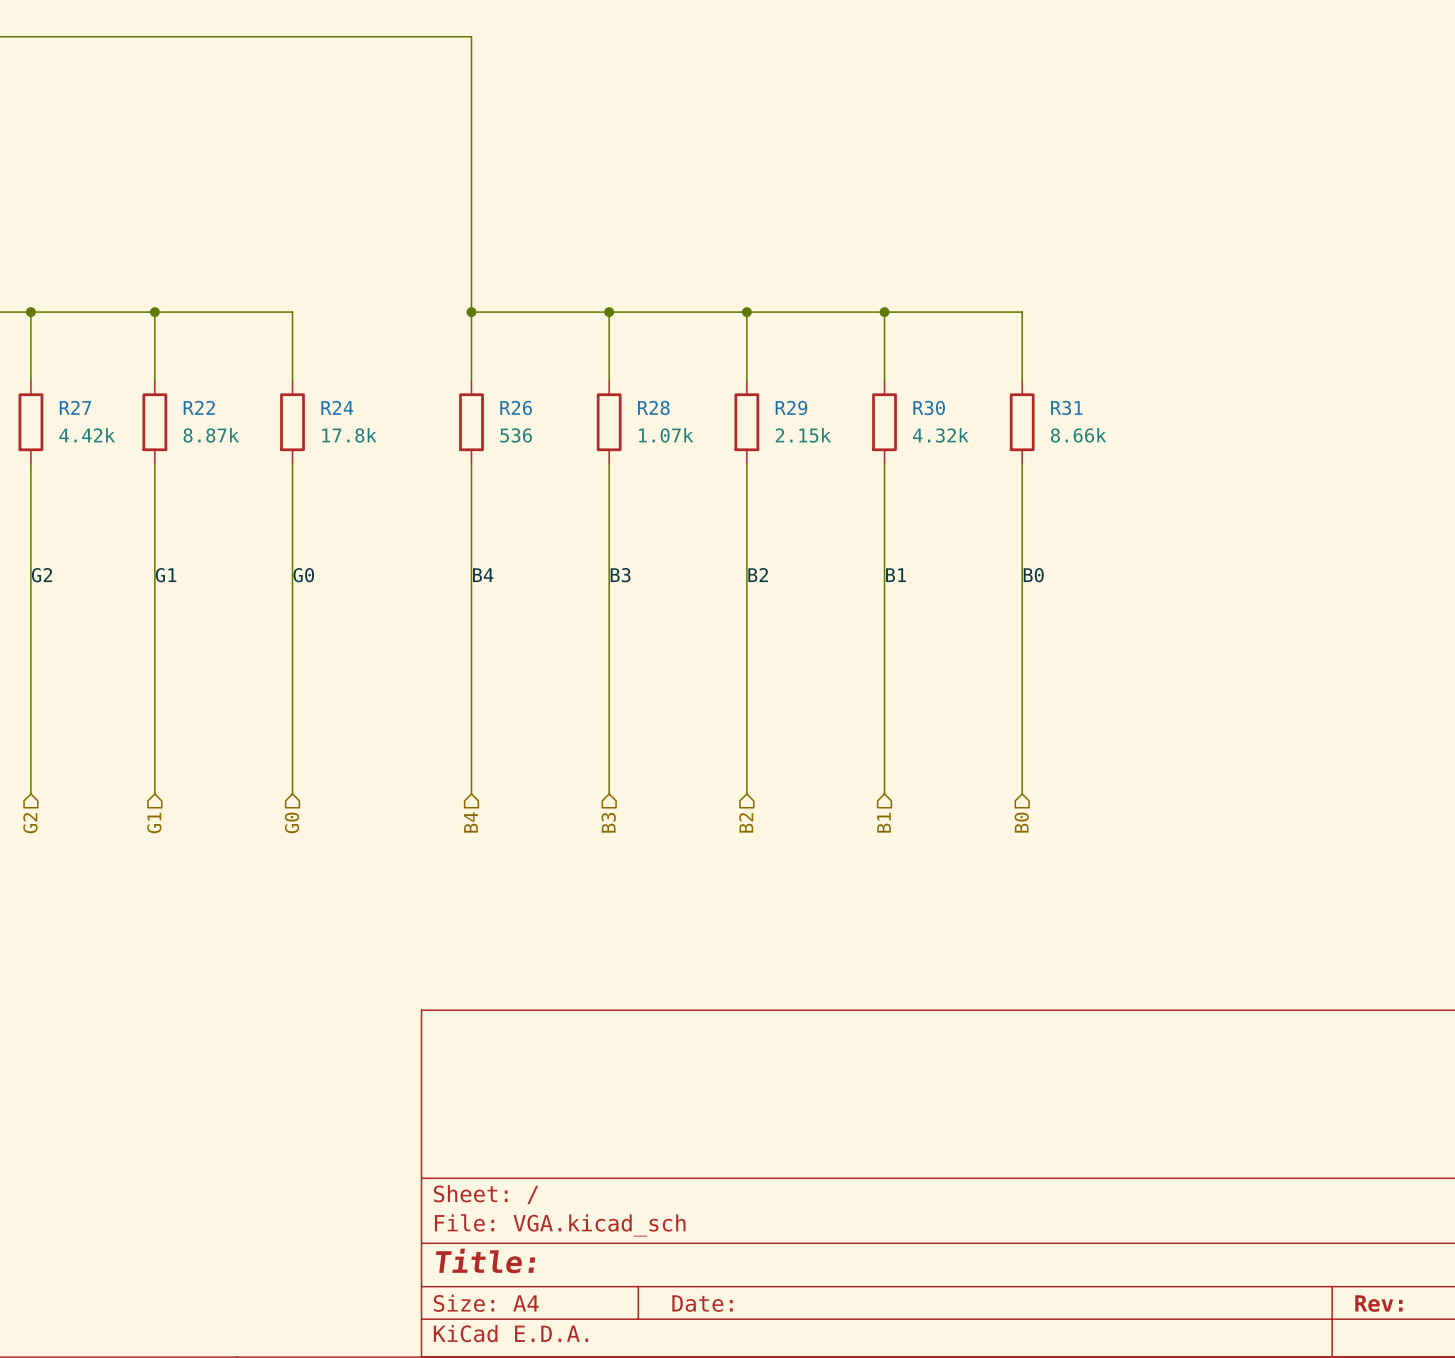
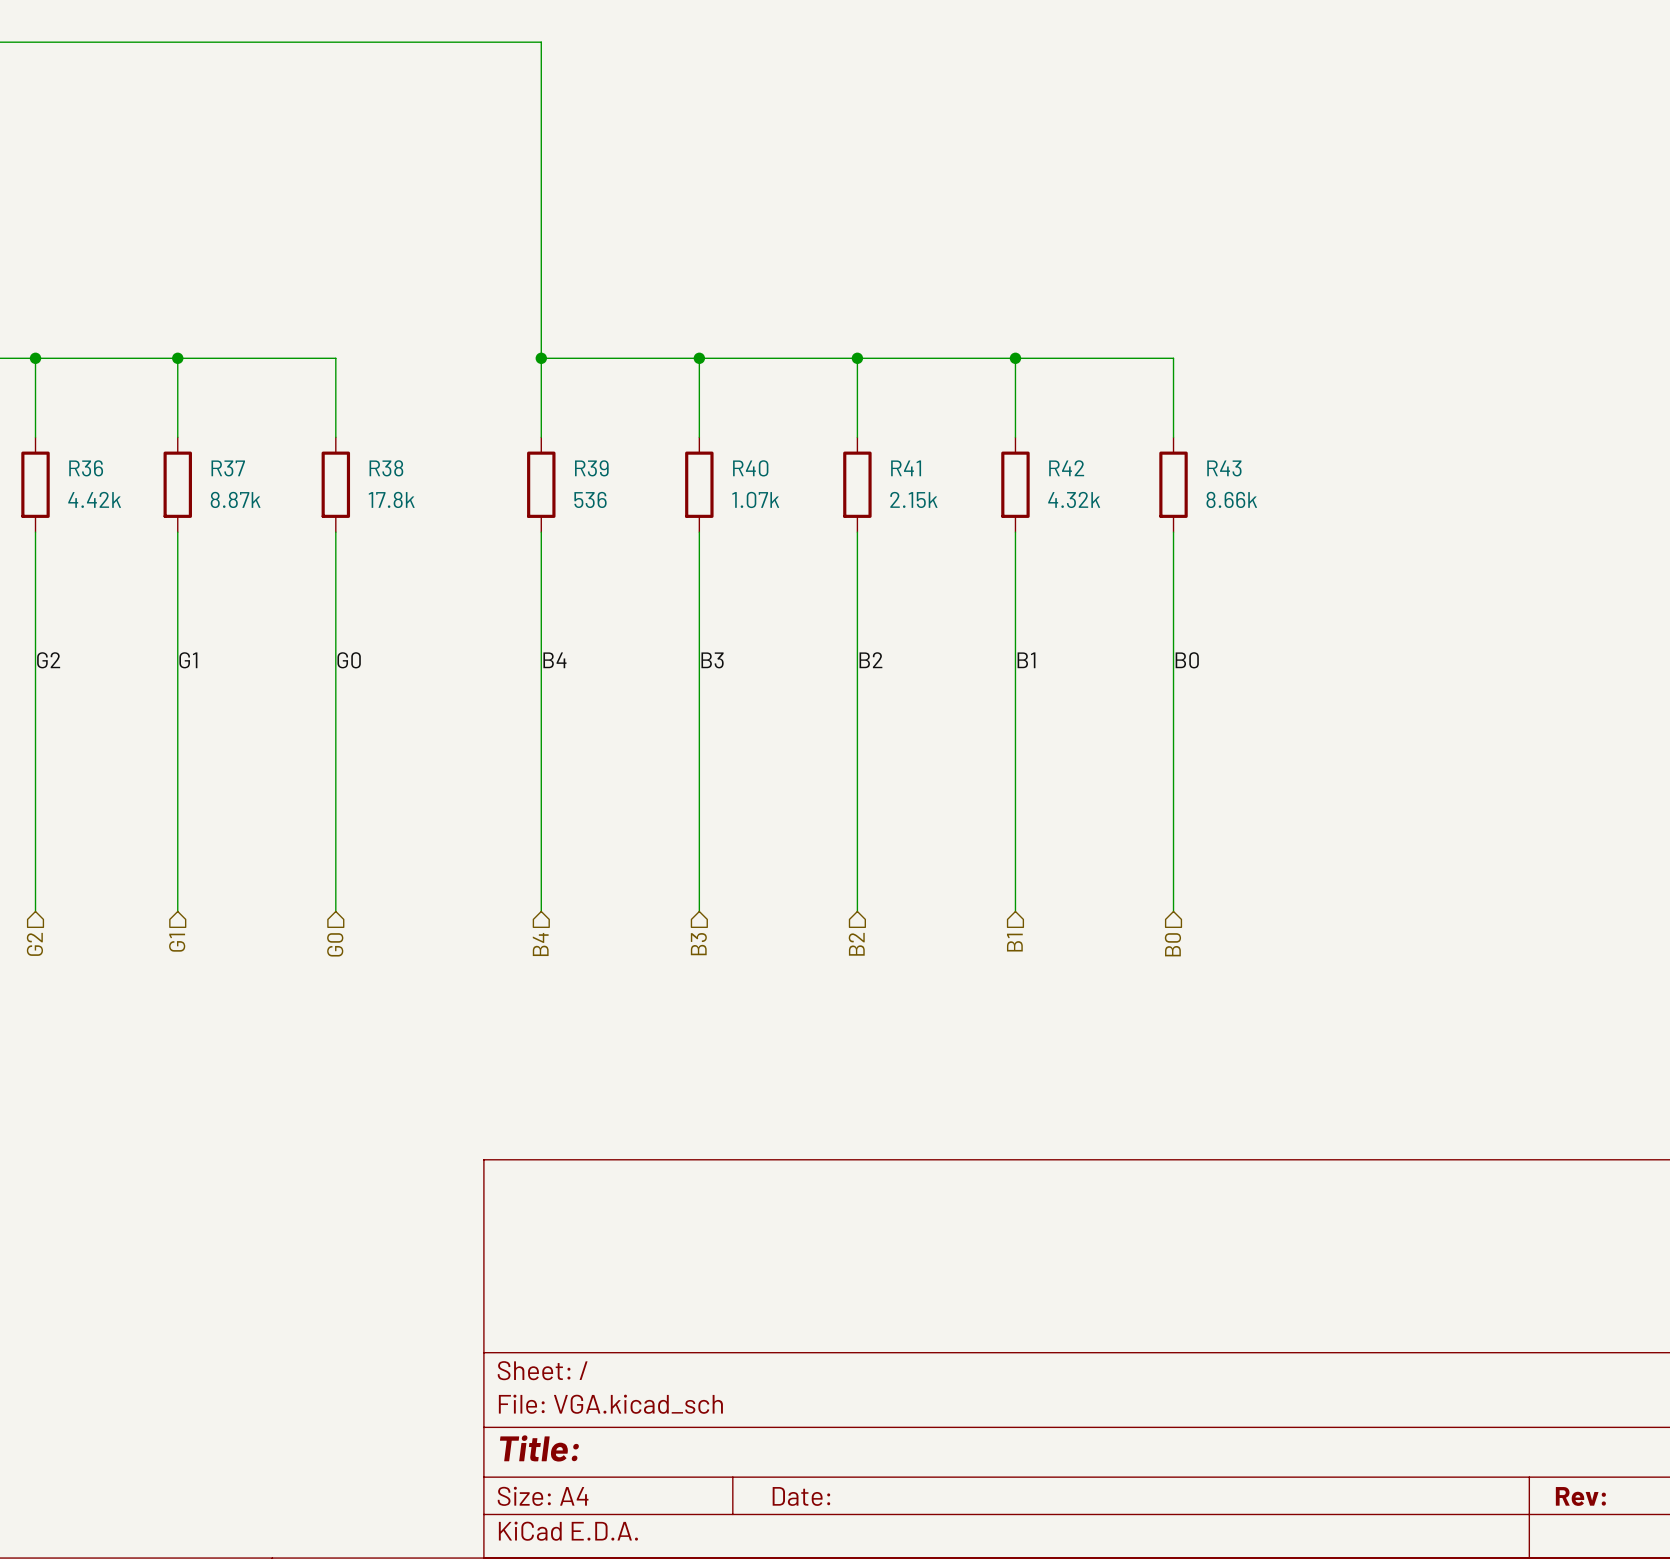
R27 name: R27 (75, 407) -> R36 (86, 468)
R22 name: R22 (199, 407) -> R37 (228, 468)
R24 name: R24 (337, 407) -> R38 (386, 468)
R26 name: R26 (516, 407) -> R39 (591, 468)
R28 name: R28 (653, 407) -> R40 (750, 468)
R29 name: R29 (791, 407) -> R41 (906, 468)
R30 name: R30 (929, 407) -> R42 (1066, 468)
R31 name: R31 (1066, 407) -> R43 (1224, 468)

